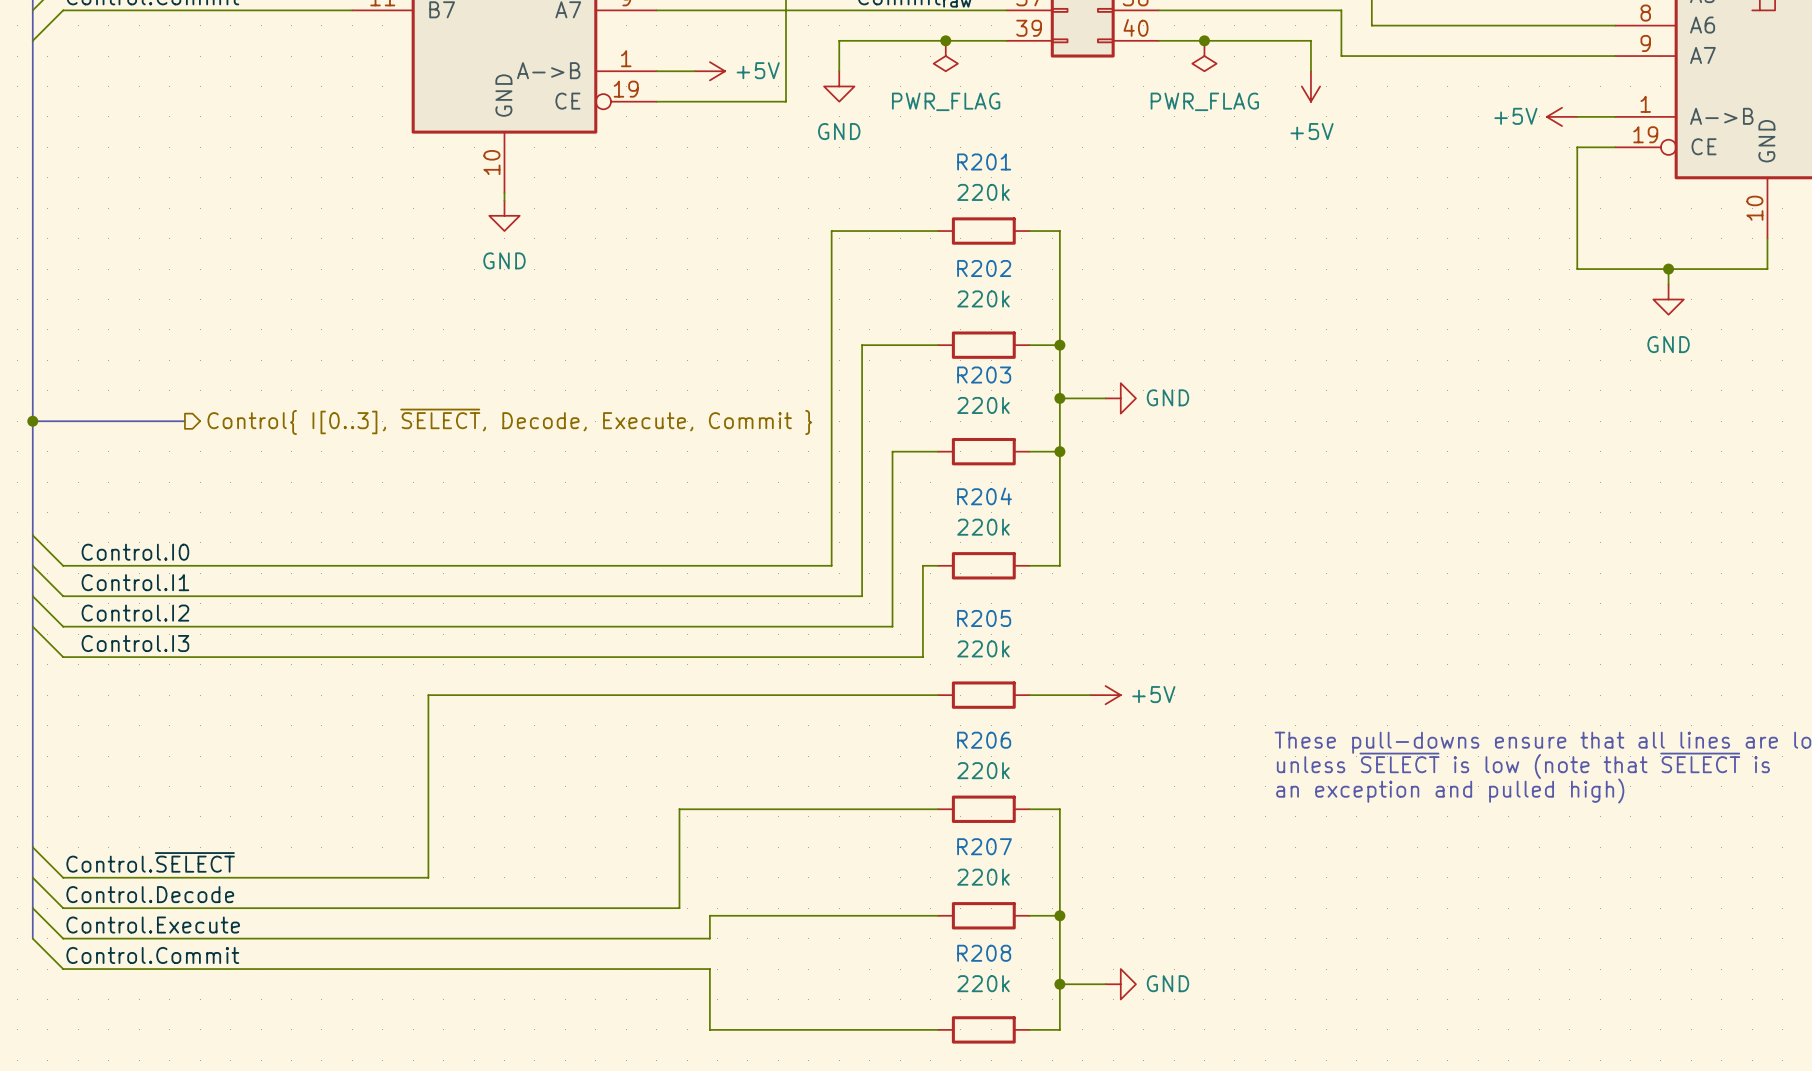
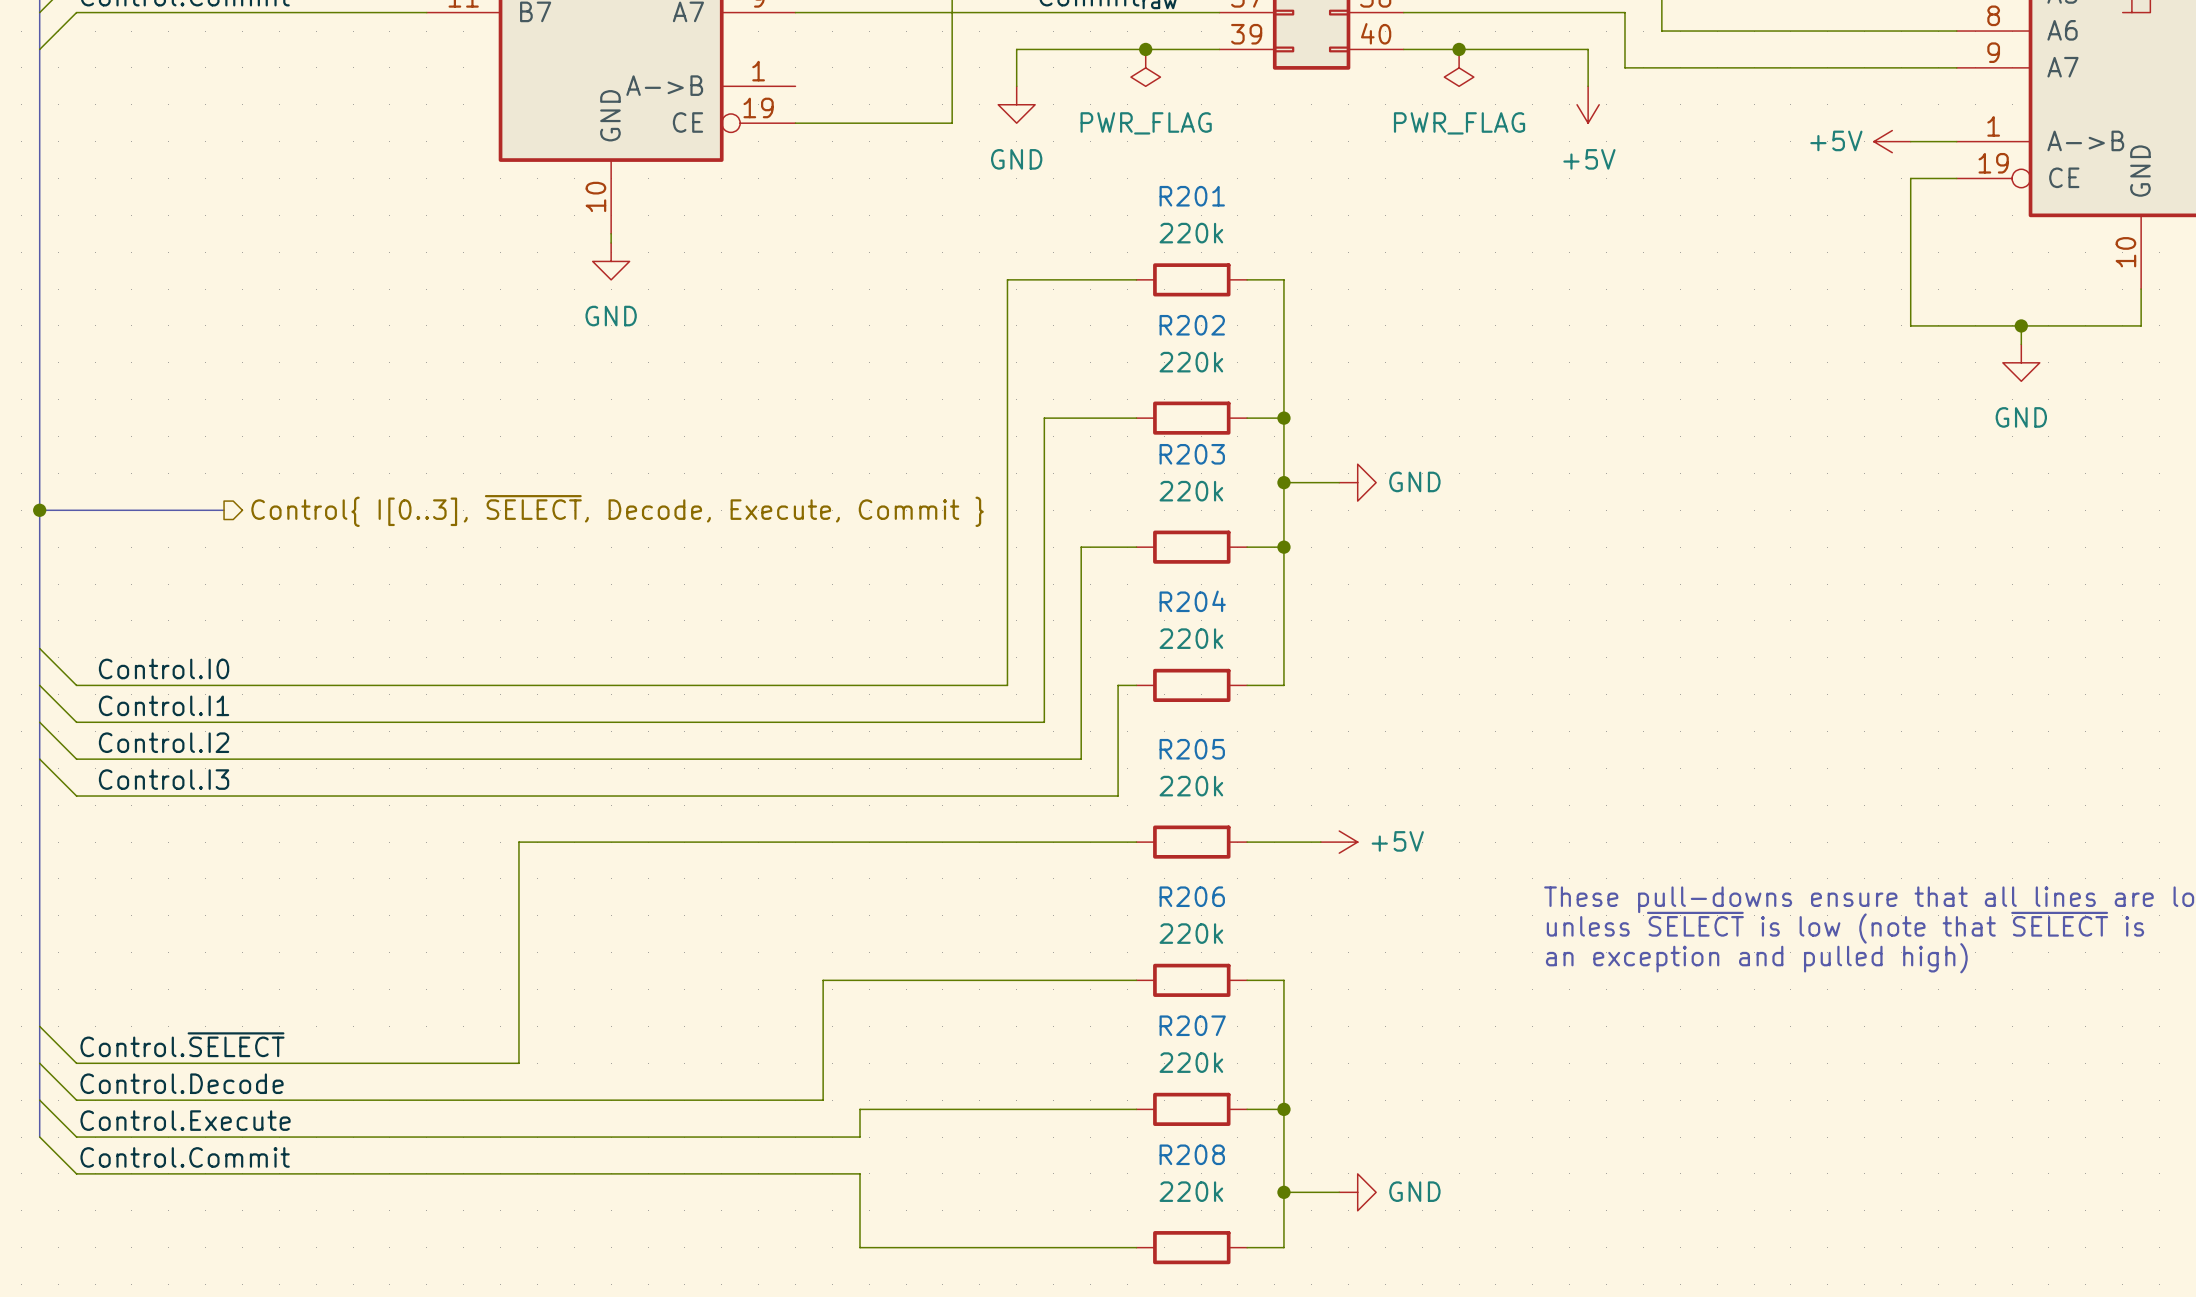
wire: (656, 71) (694, 71) -> none
power symbol: +5V (709, 71) -> none

